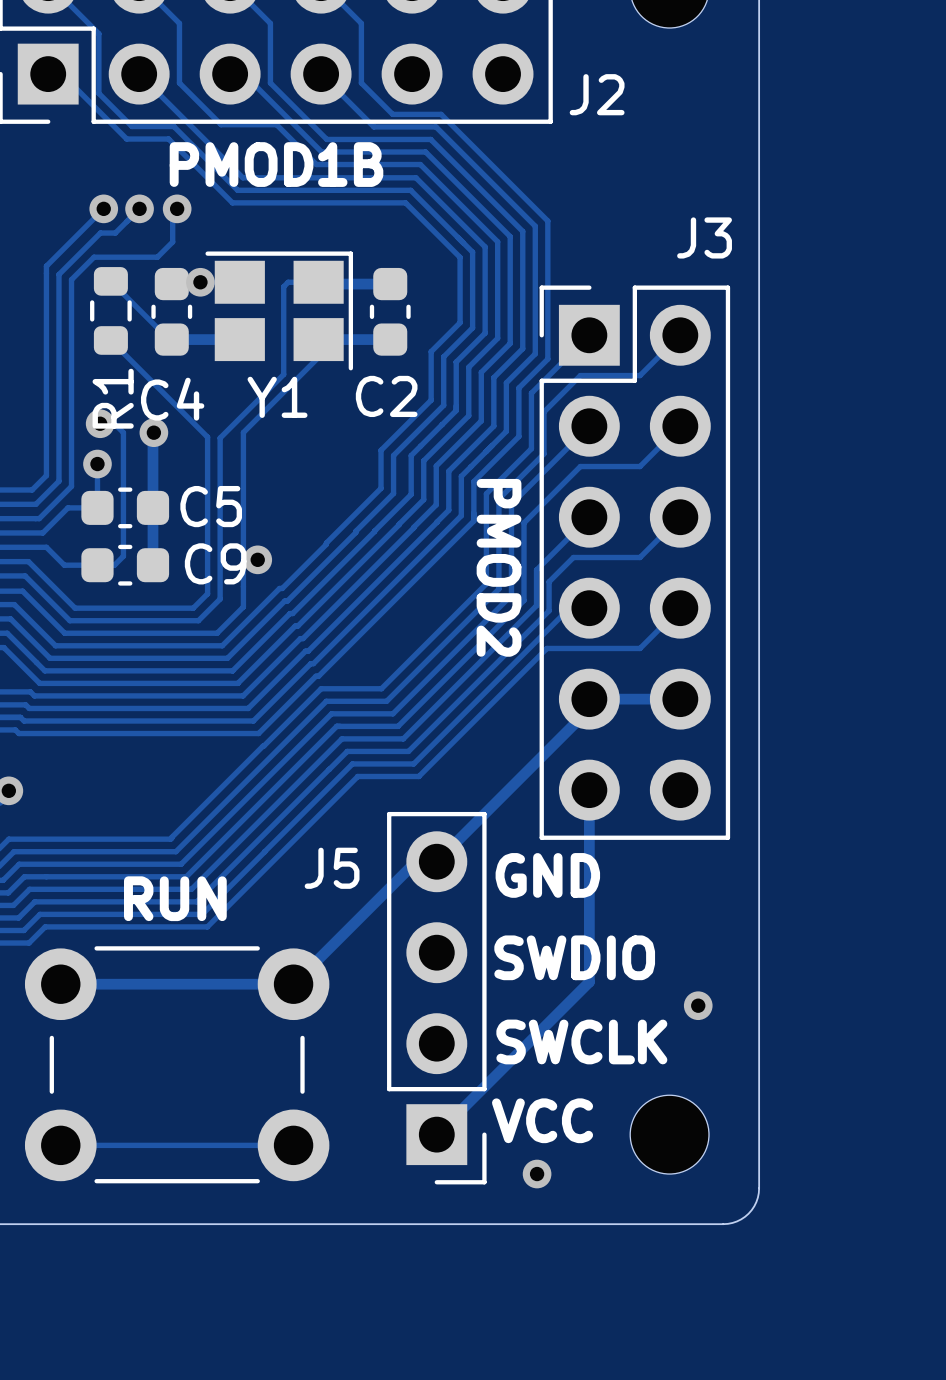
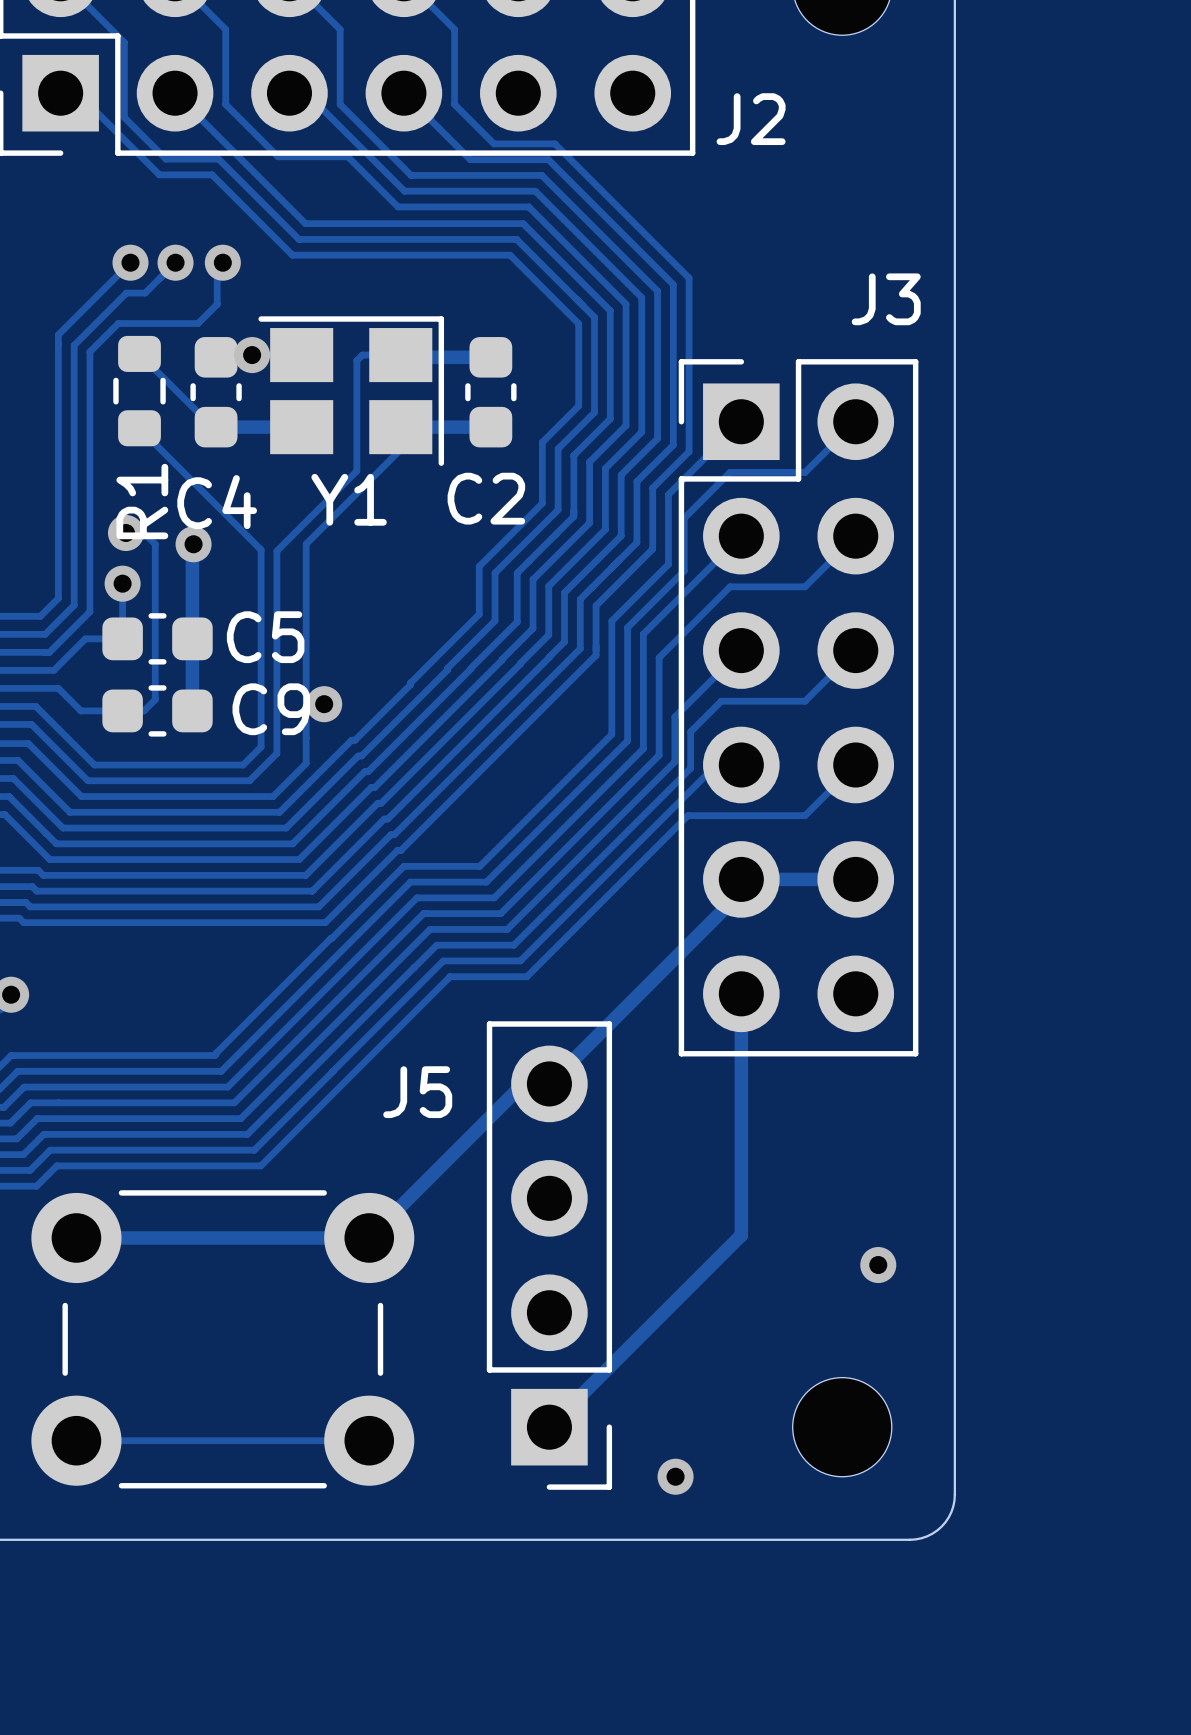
text: PMOD1B (276, 164) -> none
text: PMOD2 (499, 567) -> none
text: GND (547, 875) -> none
text: RUN (175, 898) -> none
text: SWDIO (574, 957) -> none
text: SWCLK (581, 1041) -> none
text: VCC (542, 1120) -> none

